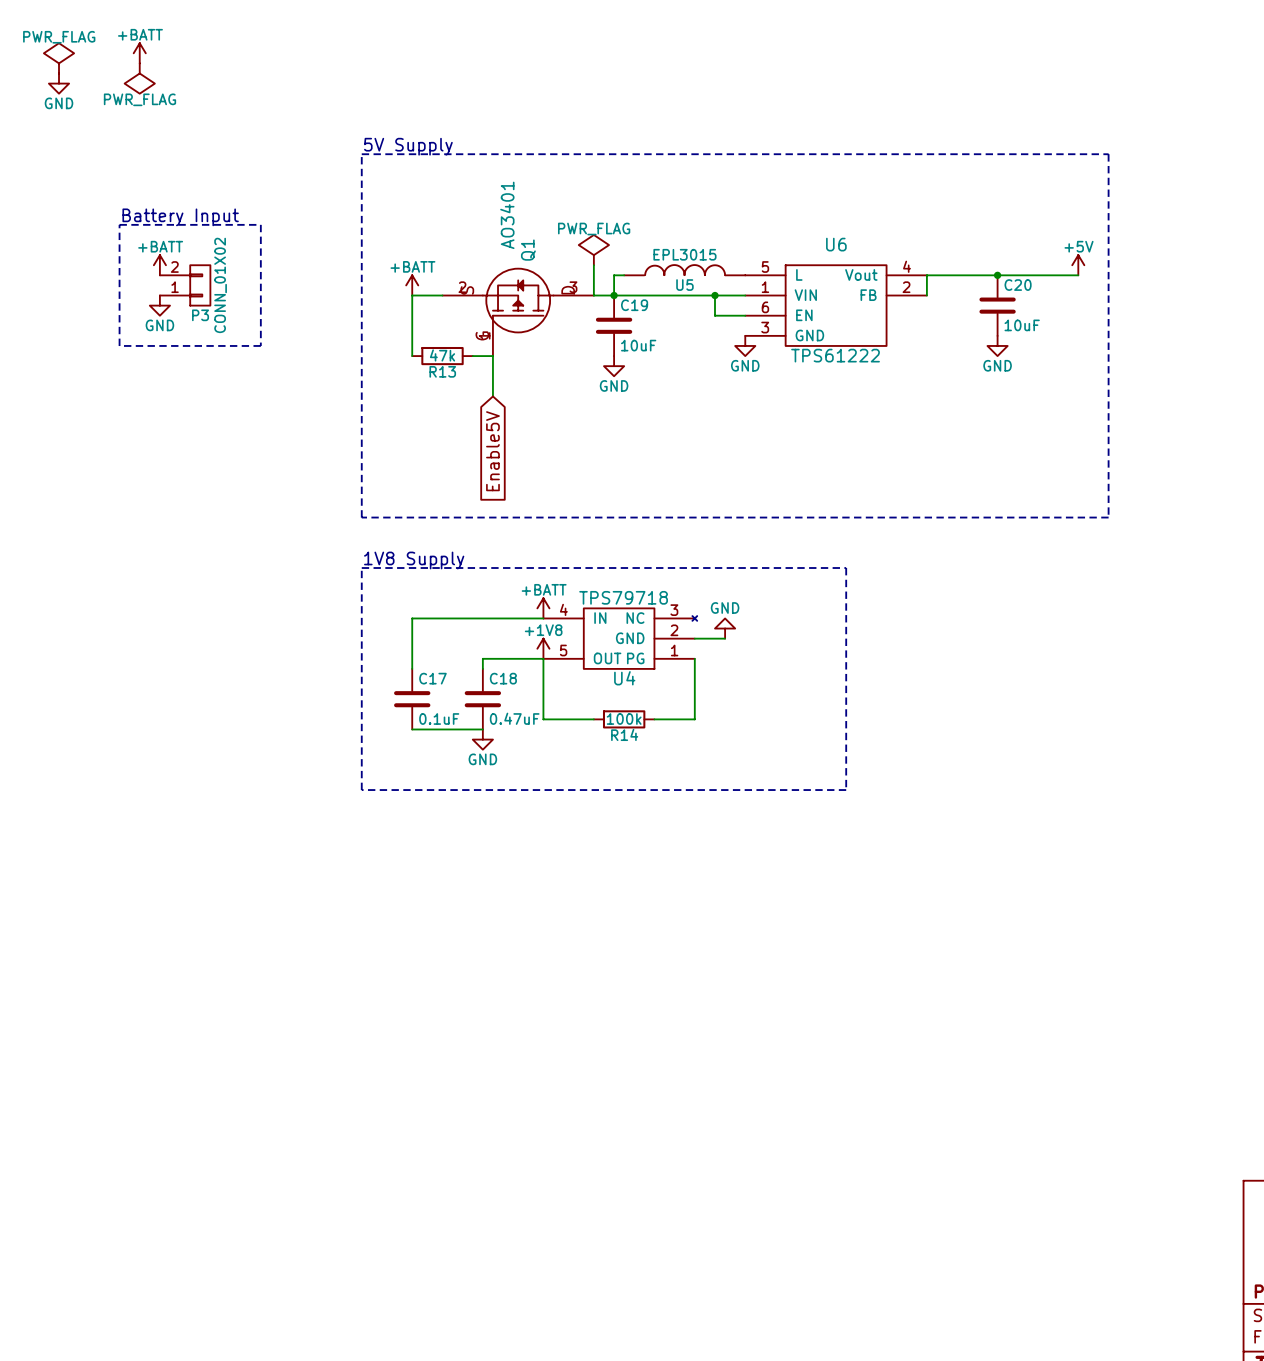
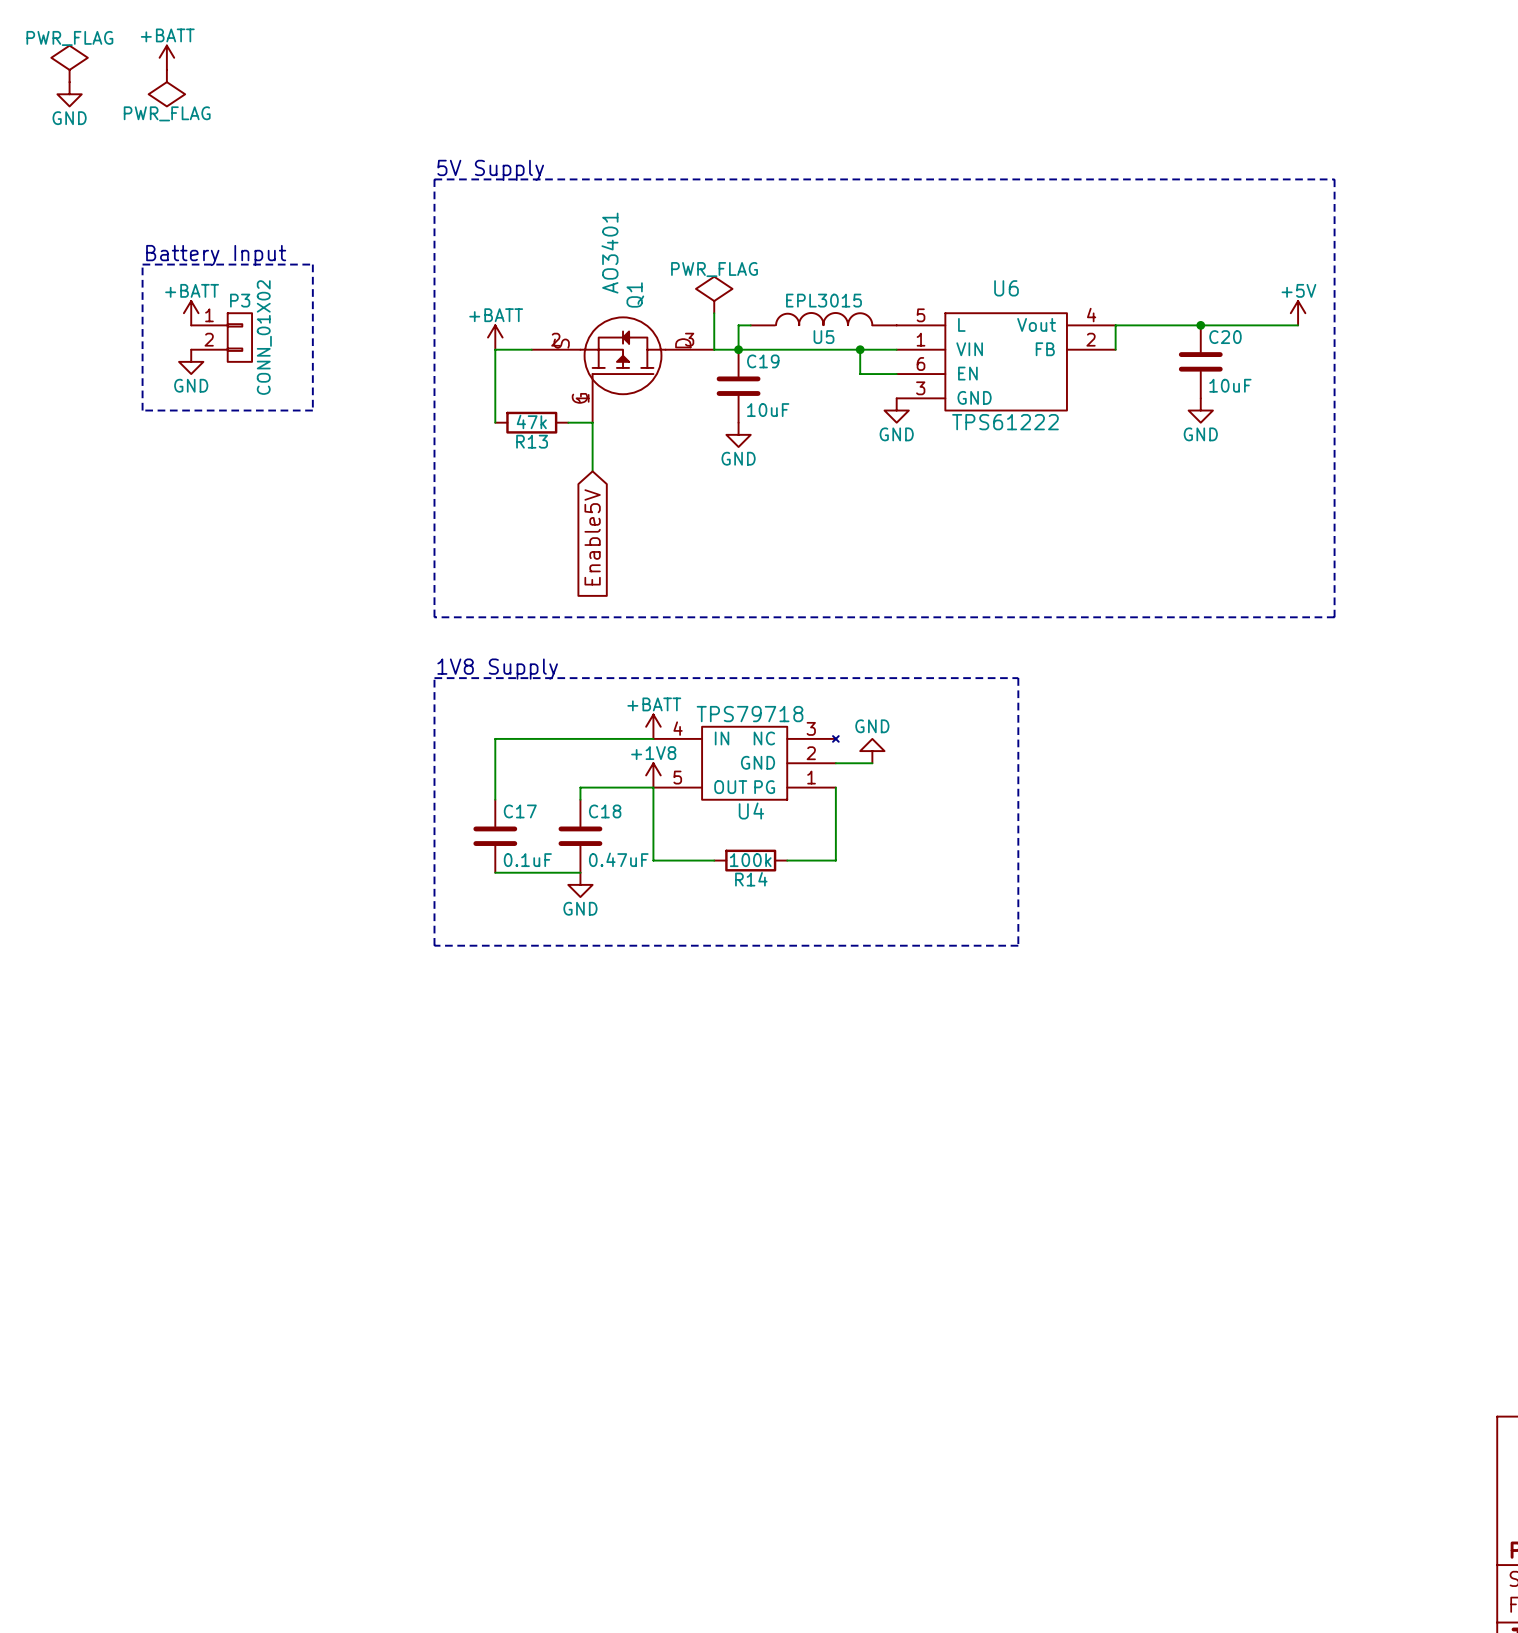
P3 flip: as is (200, 285) -> up-down (239, 337)

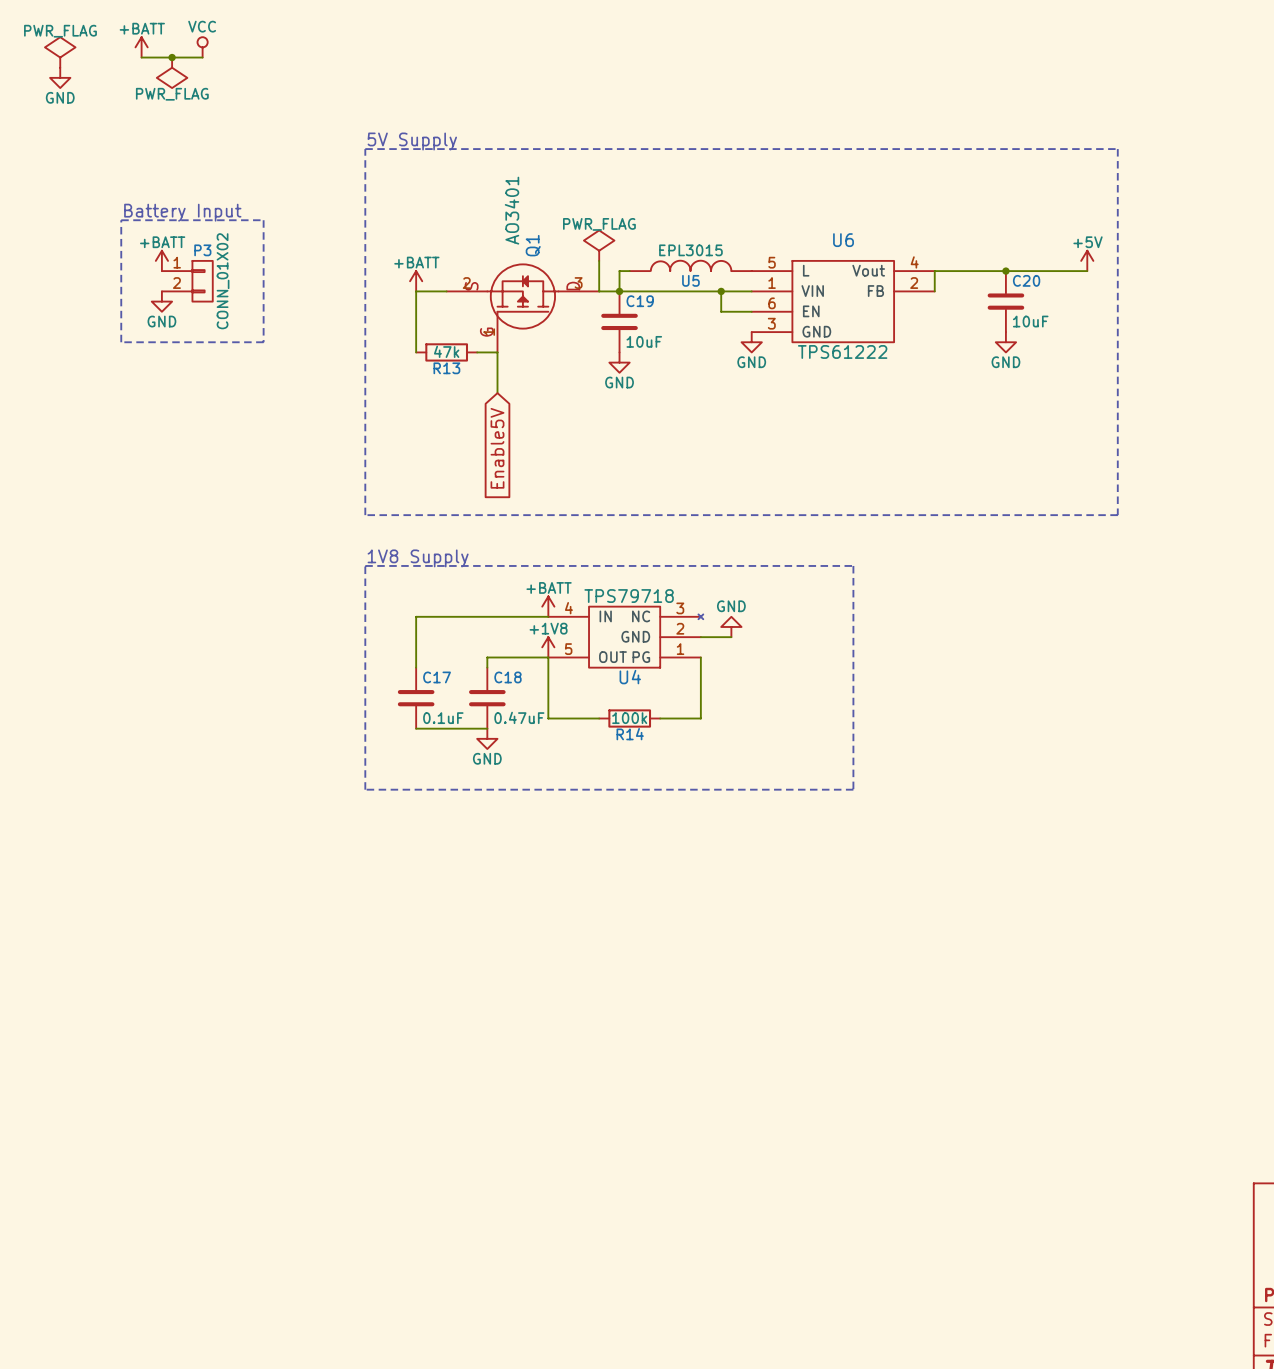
power symbol: none -> VCC (202, 47)
wire: none -> (141, 57) (202, 57)
junction: none -> (172, 57)
power symbol position: PWR_FLAG (166, 88) -> PWR_FLAG (172, 72)

